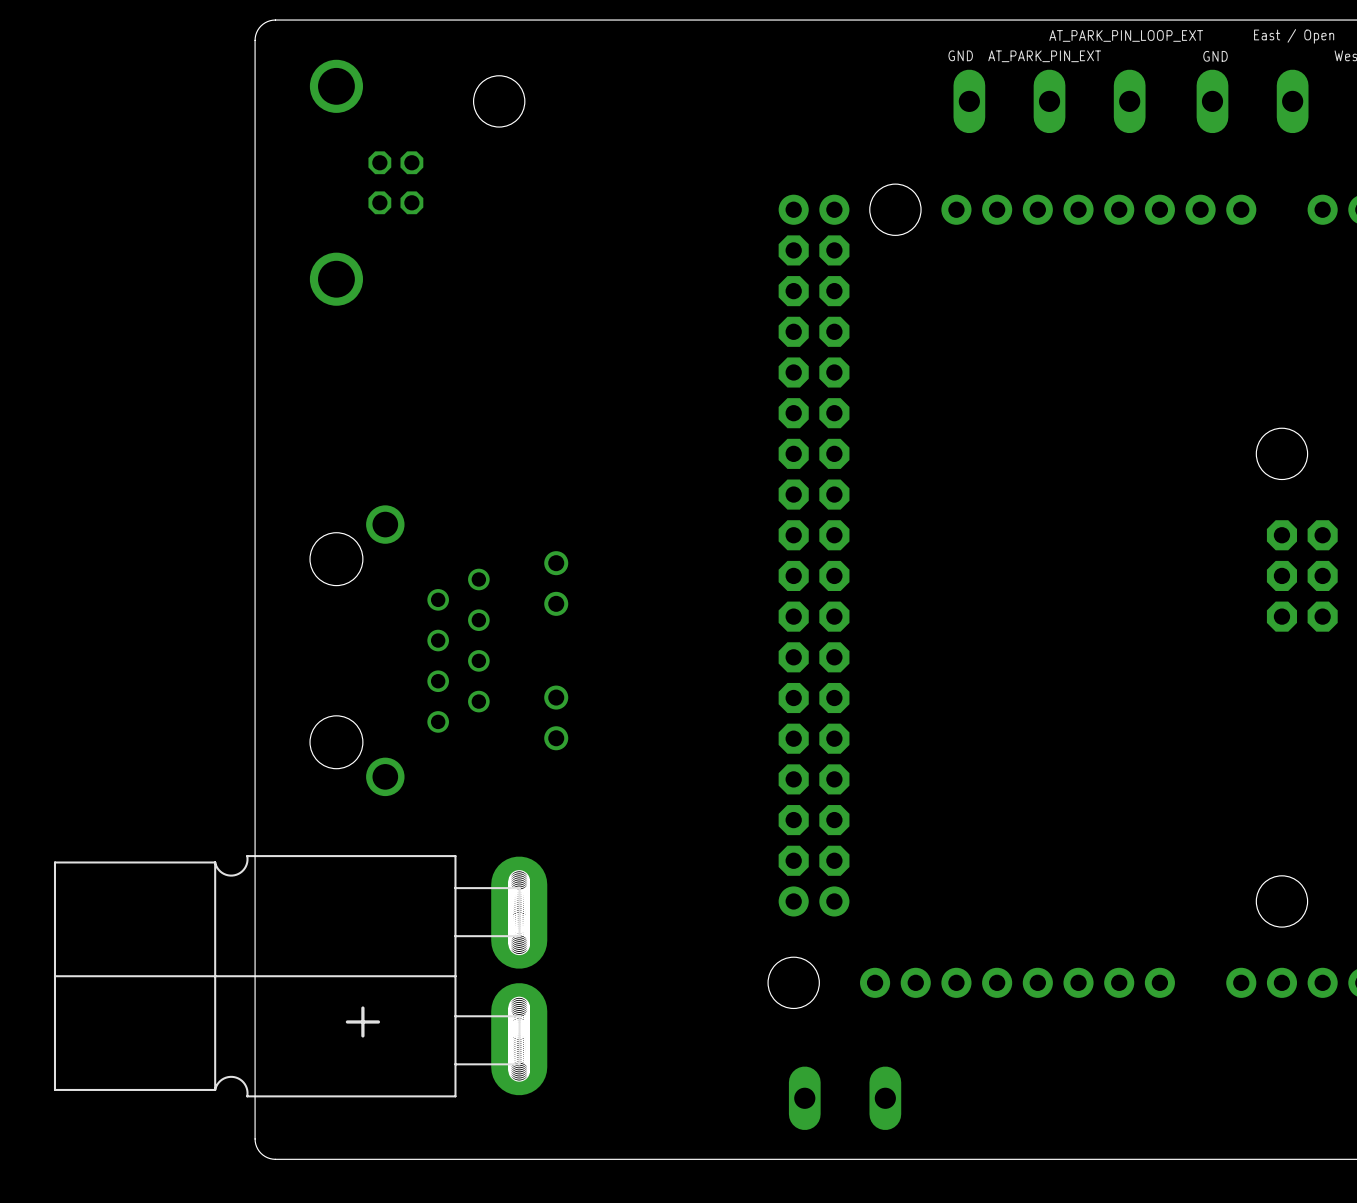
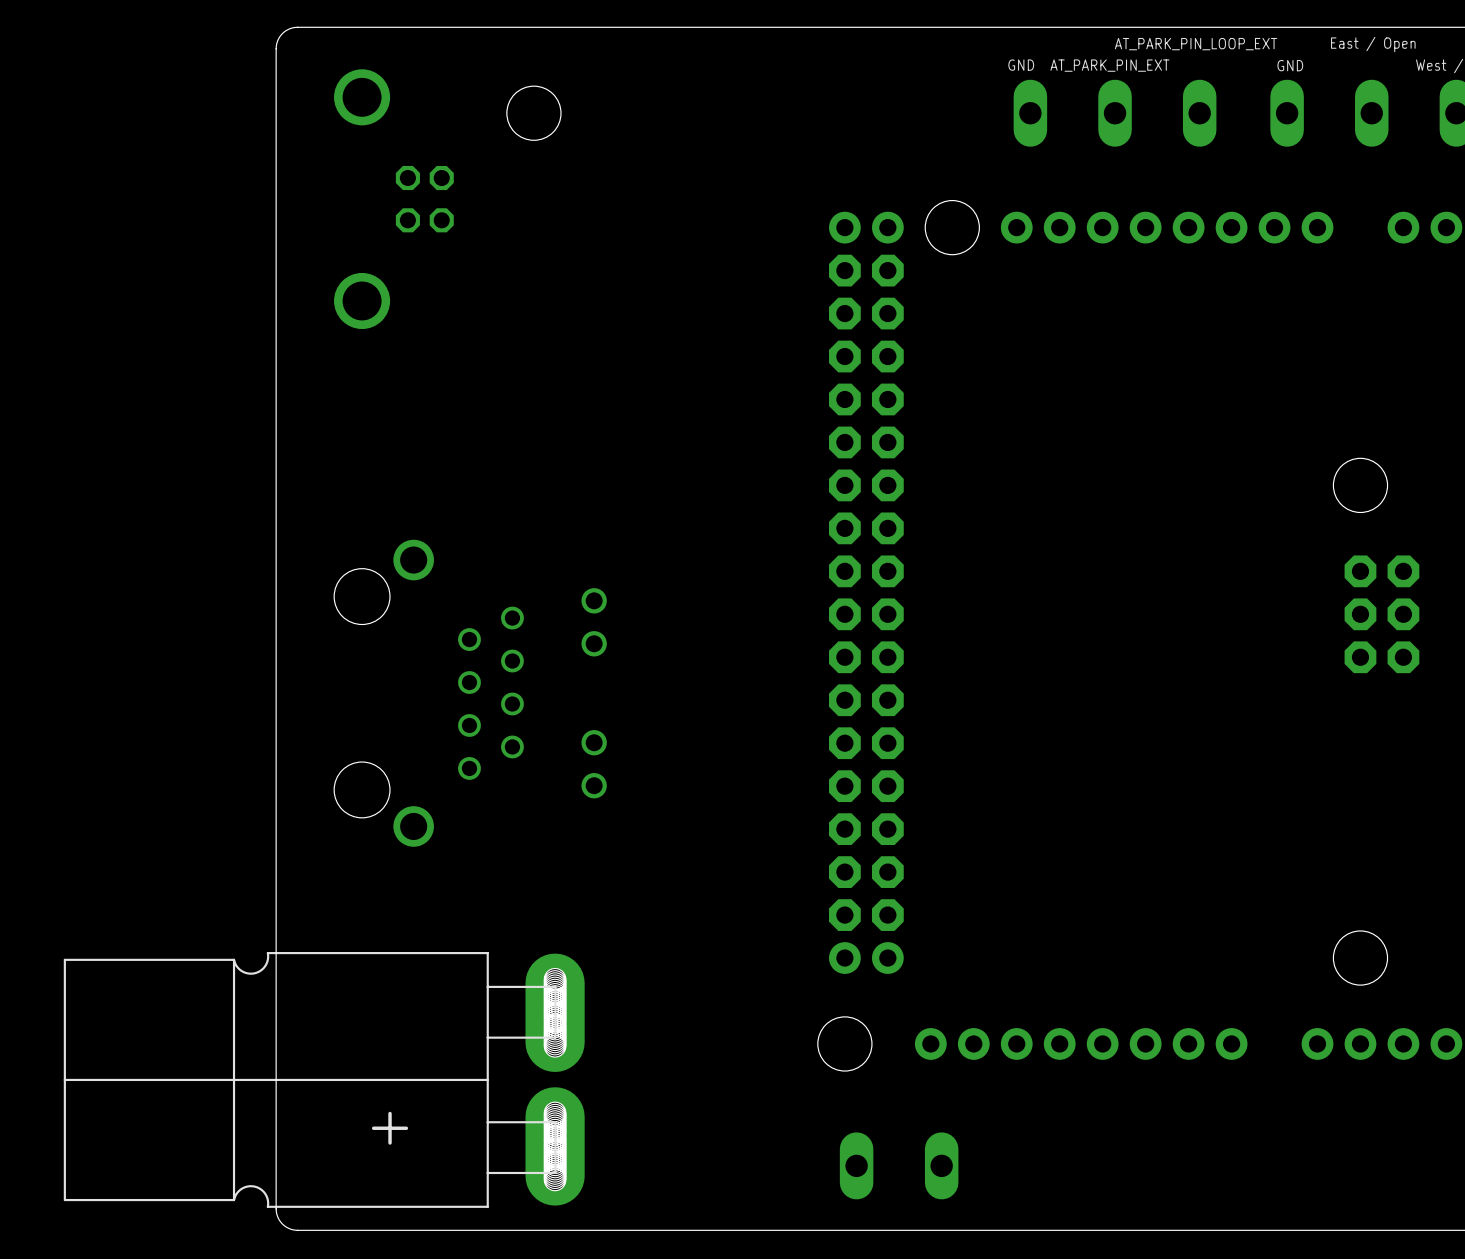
part position: (300, 976) -> (324, 1079)

